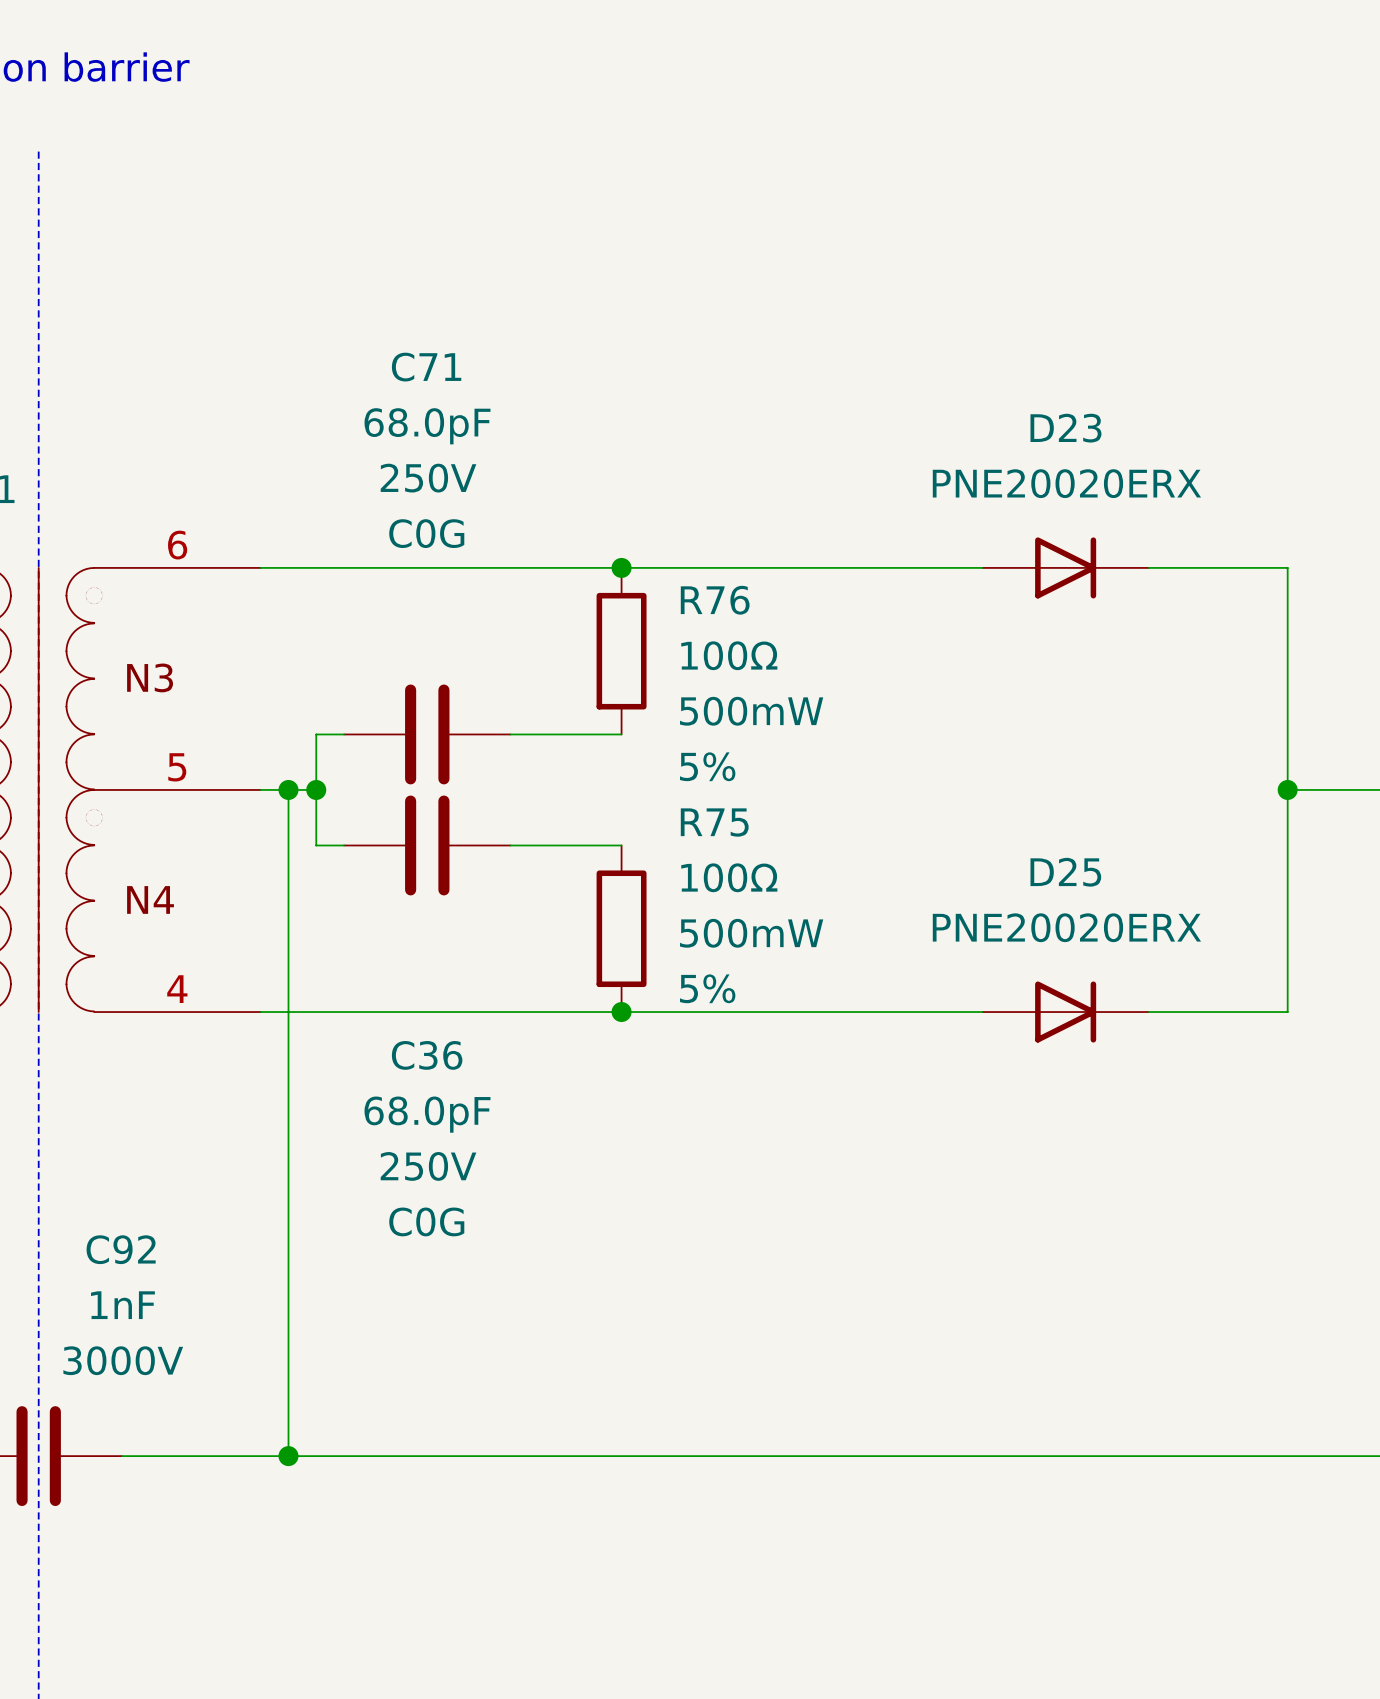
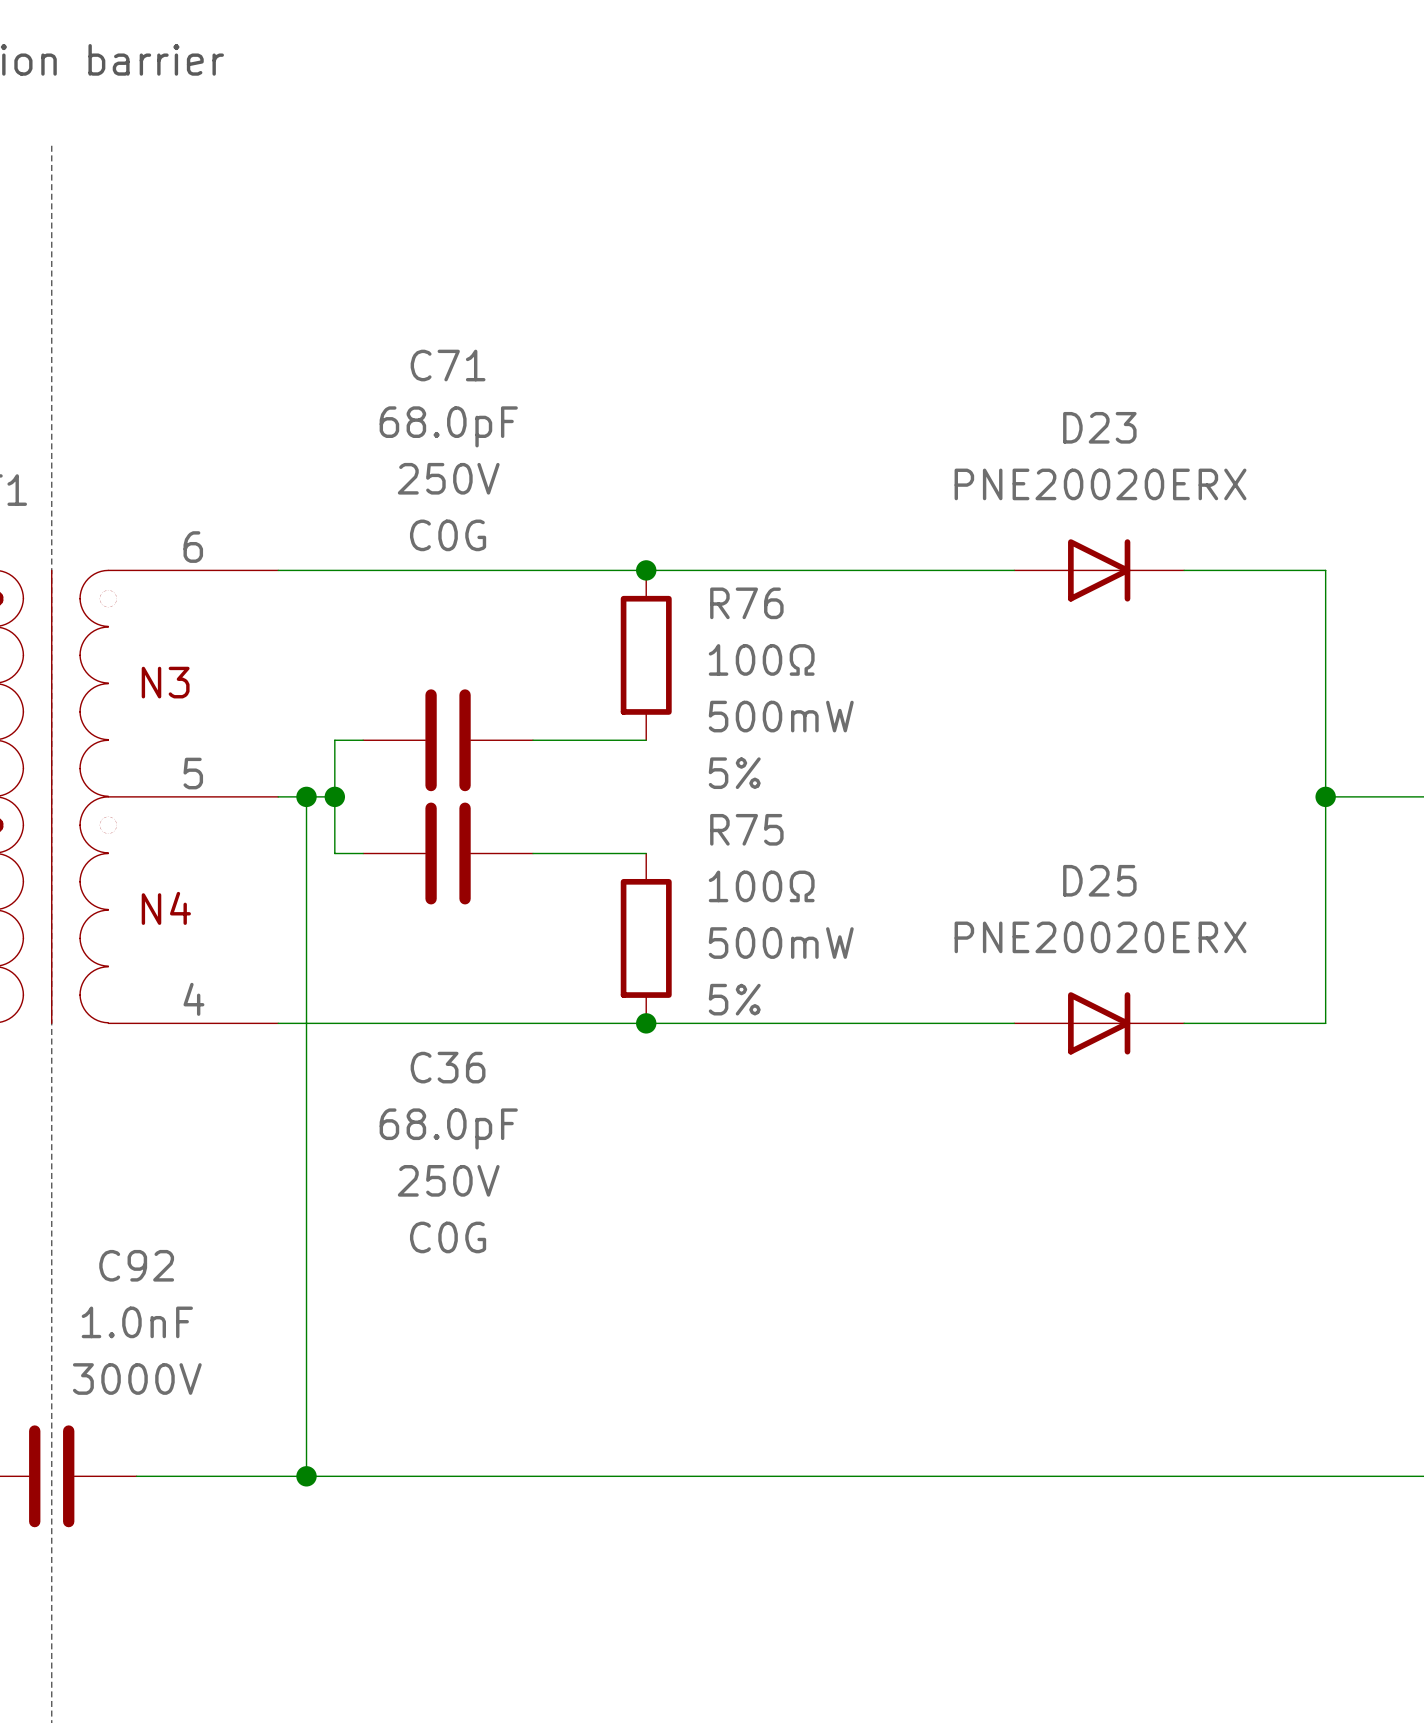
C92 value: 1nF (122, 1305) -> 1.0nF (137, 1322)

